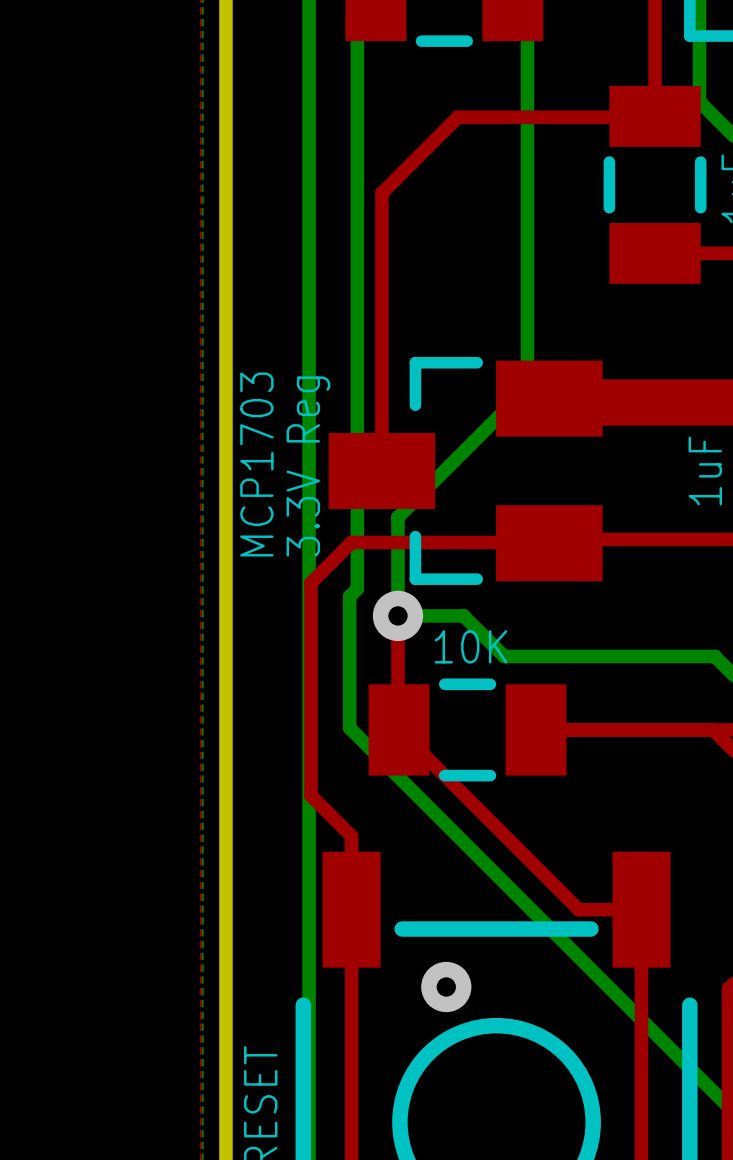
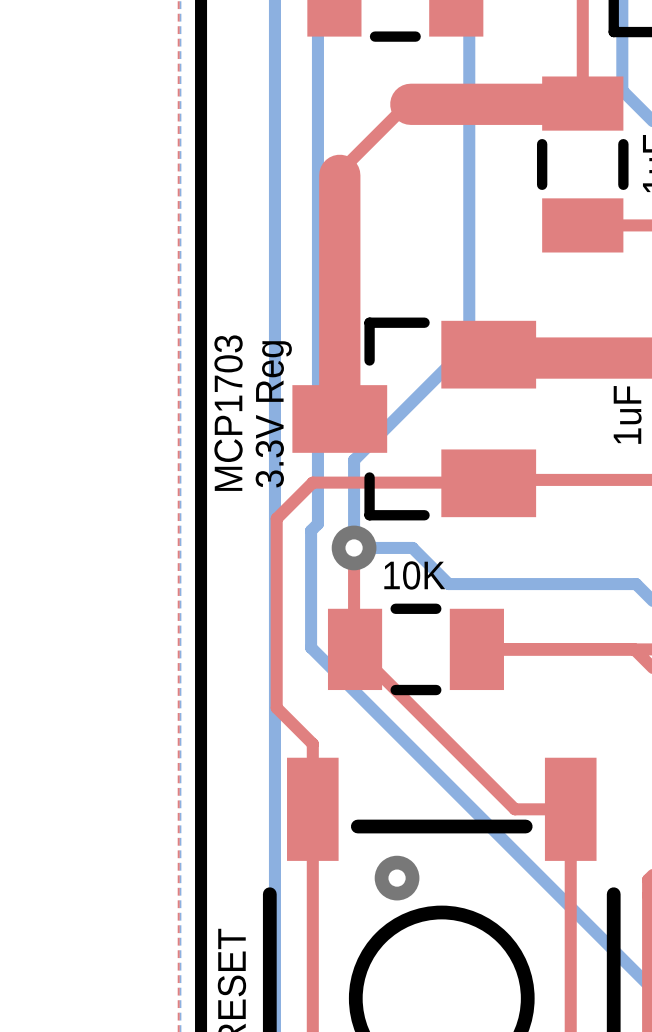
top track width: thin (461, 117) (634, 117) -> thick (410, 104) (564, 104)
top track width: thin (381, 197) (381, 470) -> thick (339, 175) (339, 418)

